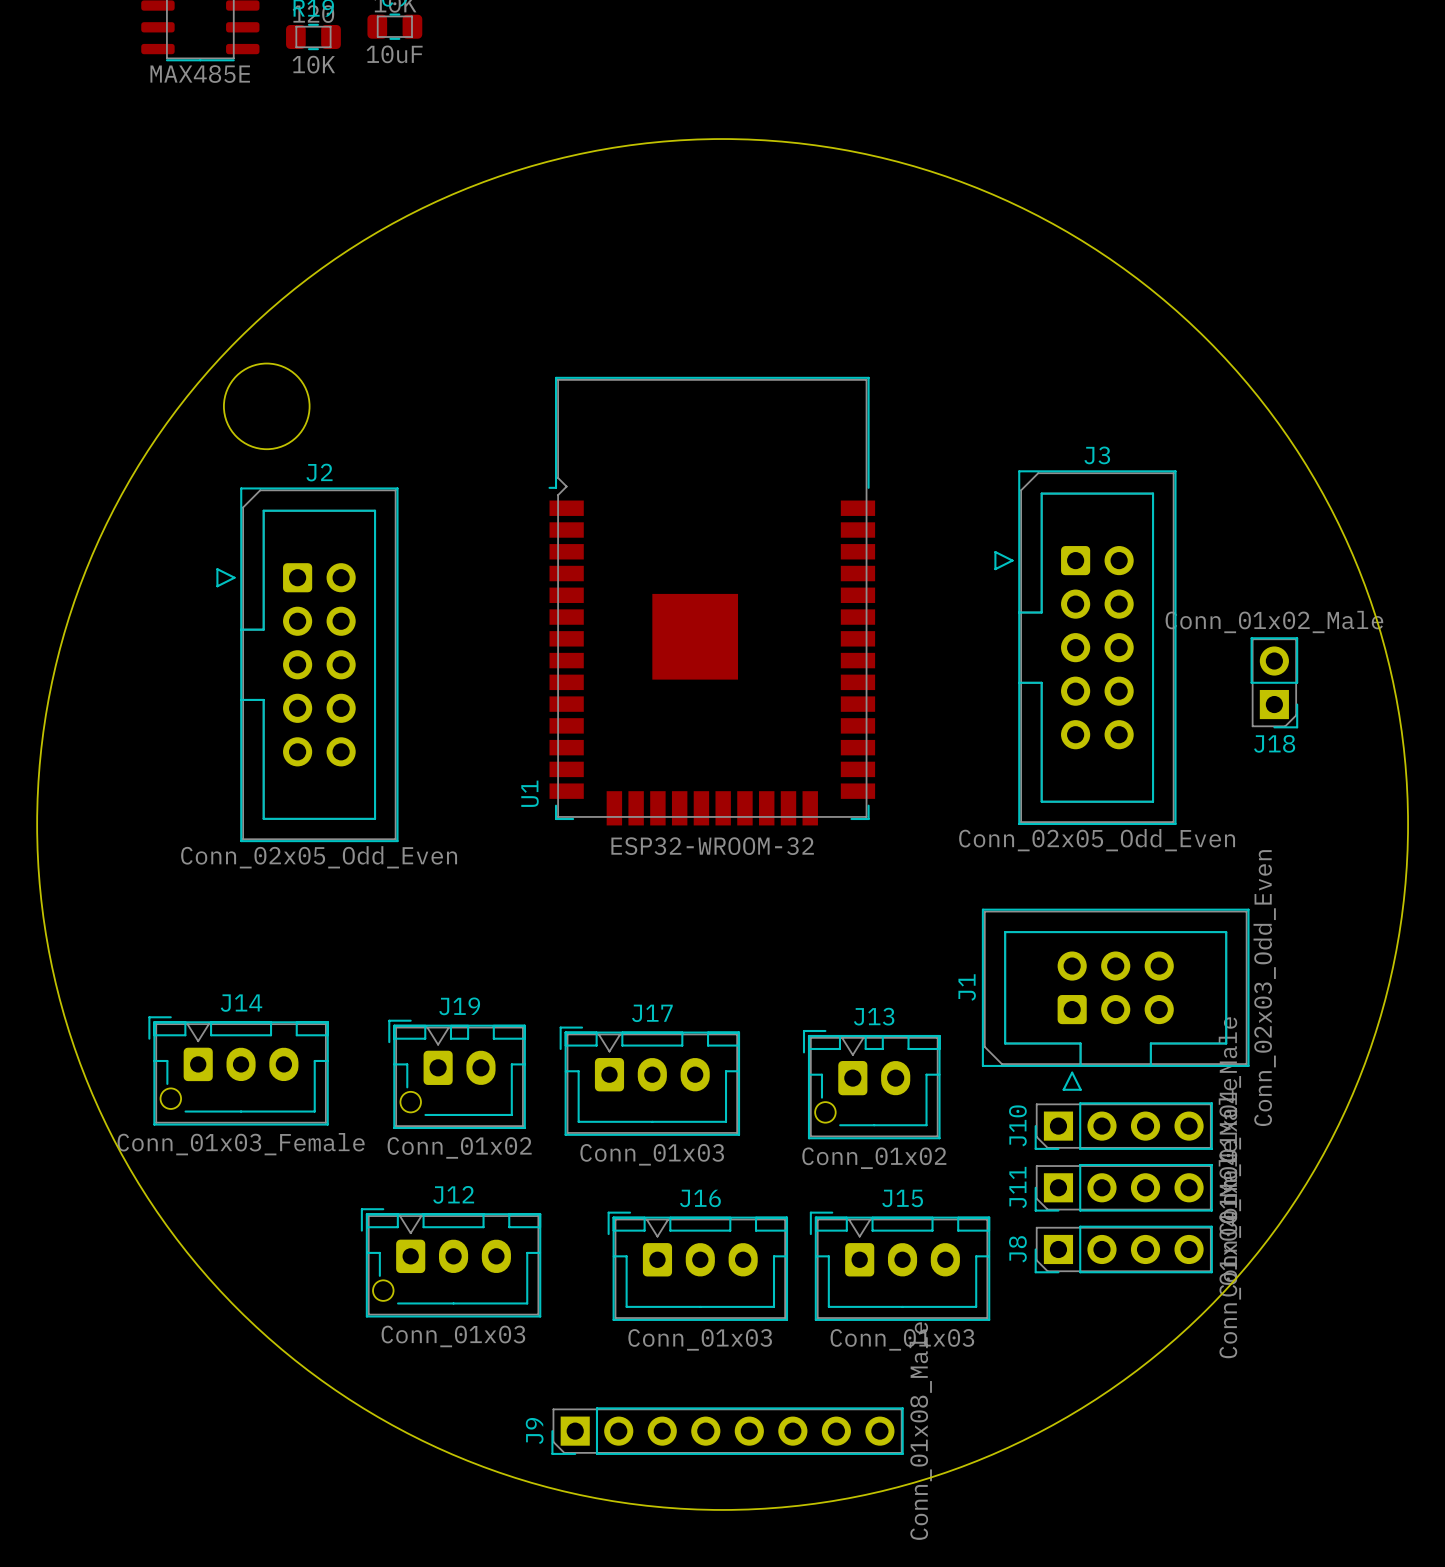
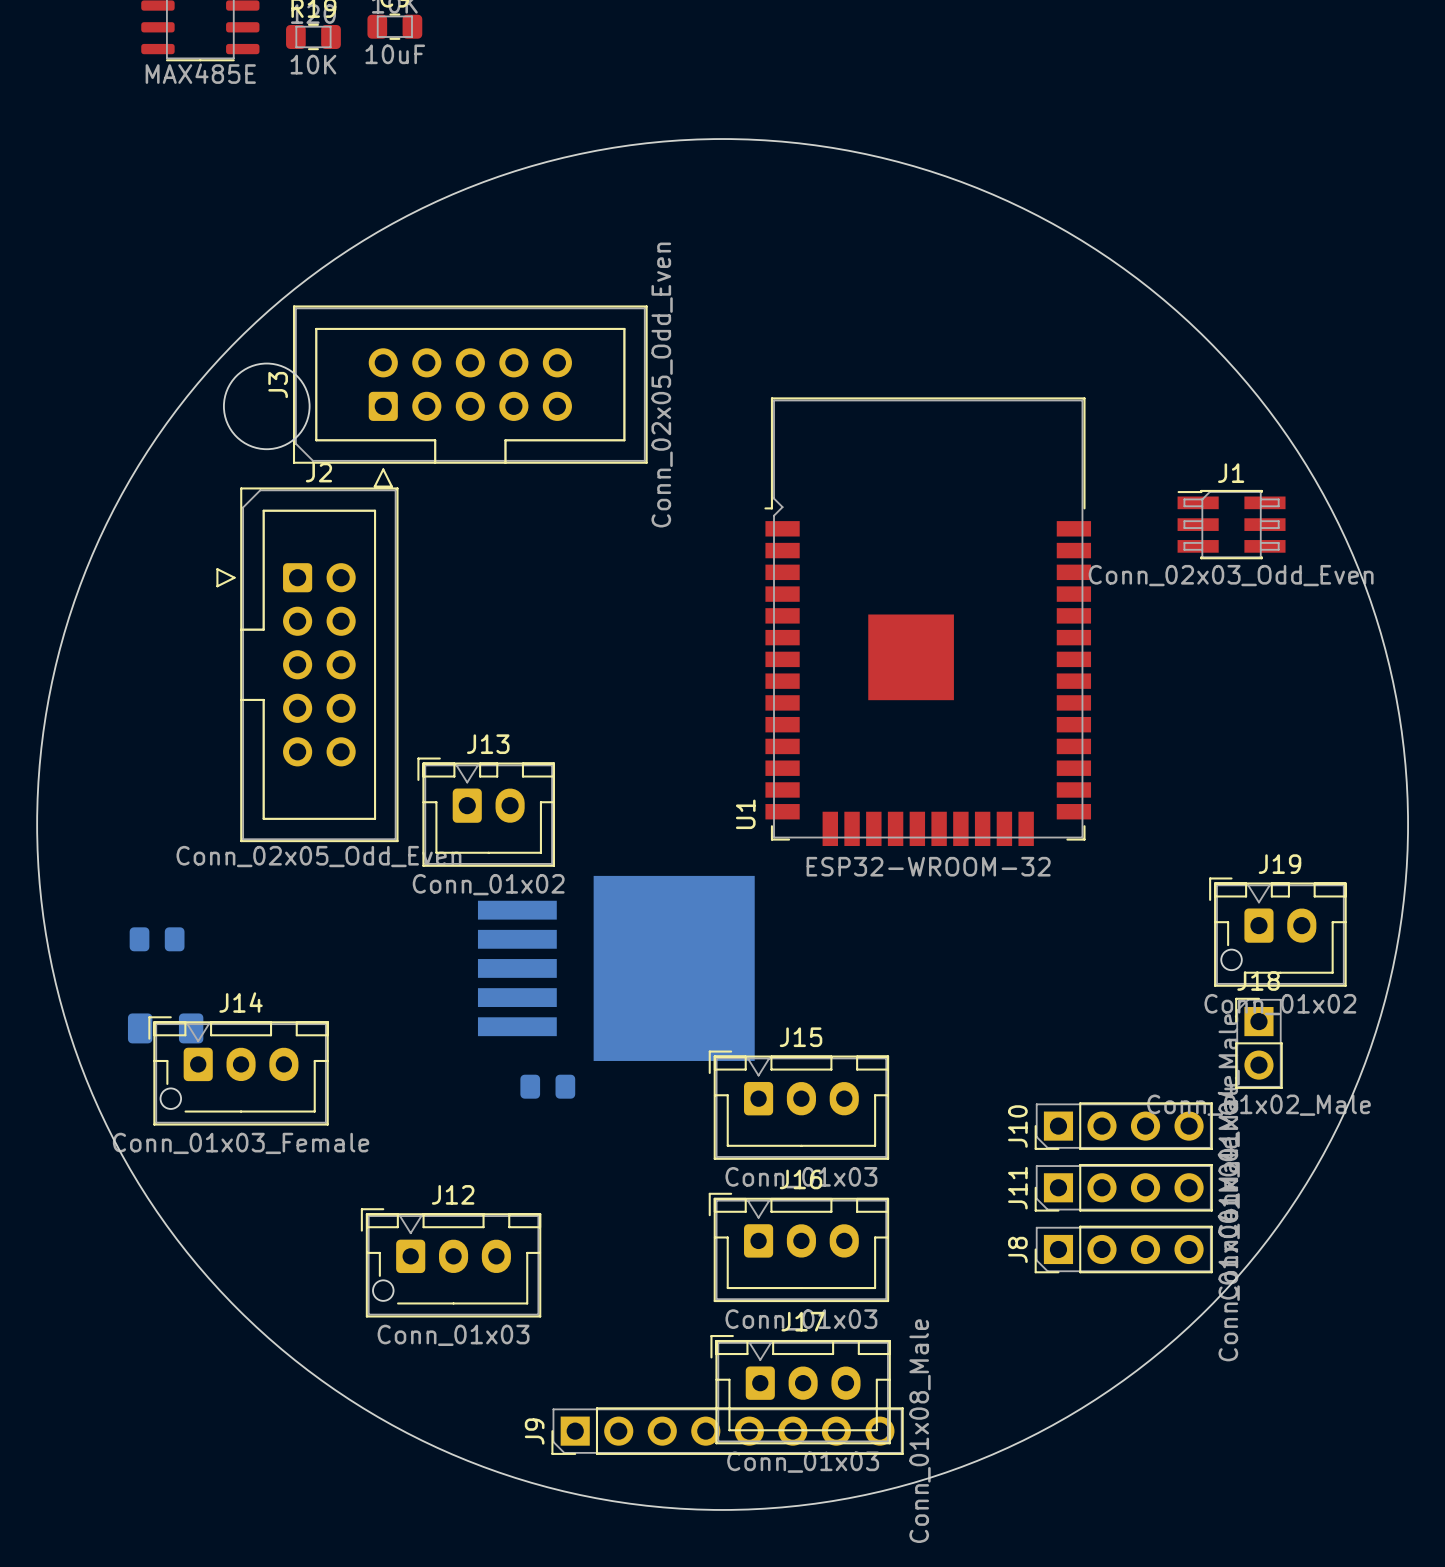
U1 position: (711, 601) -> (927, 621)
J3 rotation: 0° (1085, 647) -> 90° counterclockwise (470, 396)
J3 position: (1085, 647) -> (470, 396)
J18 rotation: 0° (1274, 682) -> 180° (1258, 1043)
J18 position: (1274, 682) -> (1258, 1043)
J1 footprint: [981, 908, 1250, 1091] -> [1177, 489, 1286, 560]
part: none -> (157, 939)
part: none -> (616, 968)
J1 name position: J1 (967, 987) -> J1 (1231, 473)
J1 value position: Conn_02x03_Odd_Even (1264, 988) -> Conn_02x03_Odd_Even (1231, 575)
part: none -> (165, 1028)
J13 footprint: [802, 1029, 941, 1140] -> [417, 757, 555, 867]
J19 position: (457, 1074) -> (1277, 932)
J17 position: (649, 1081) -> (800, 1389)
part: none -> (547, 1086)
J16 position: (697, 1266) -> (798, 1247)
J15 position: (900, 1266) -> (798, 1105)

